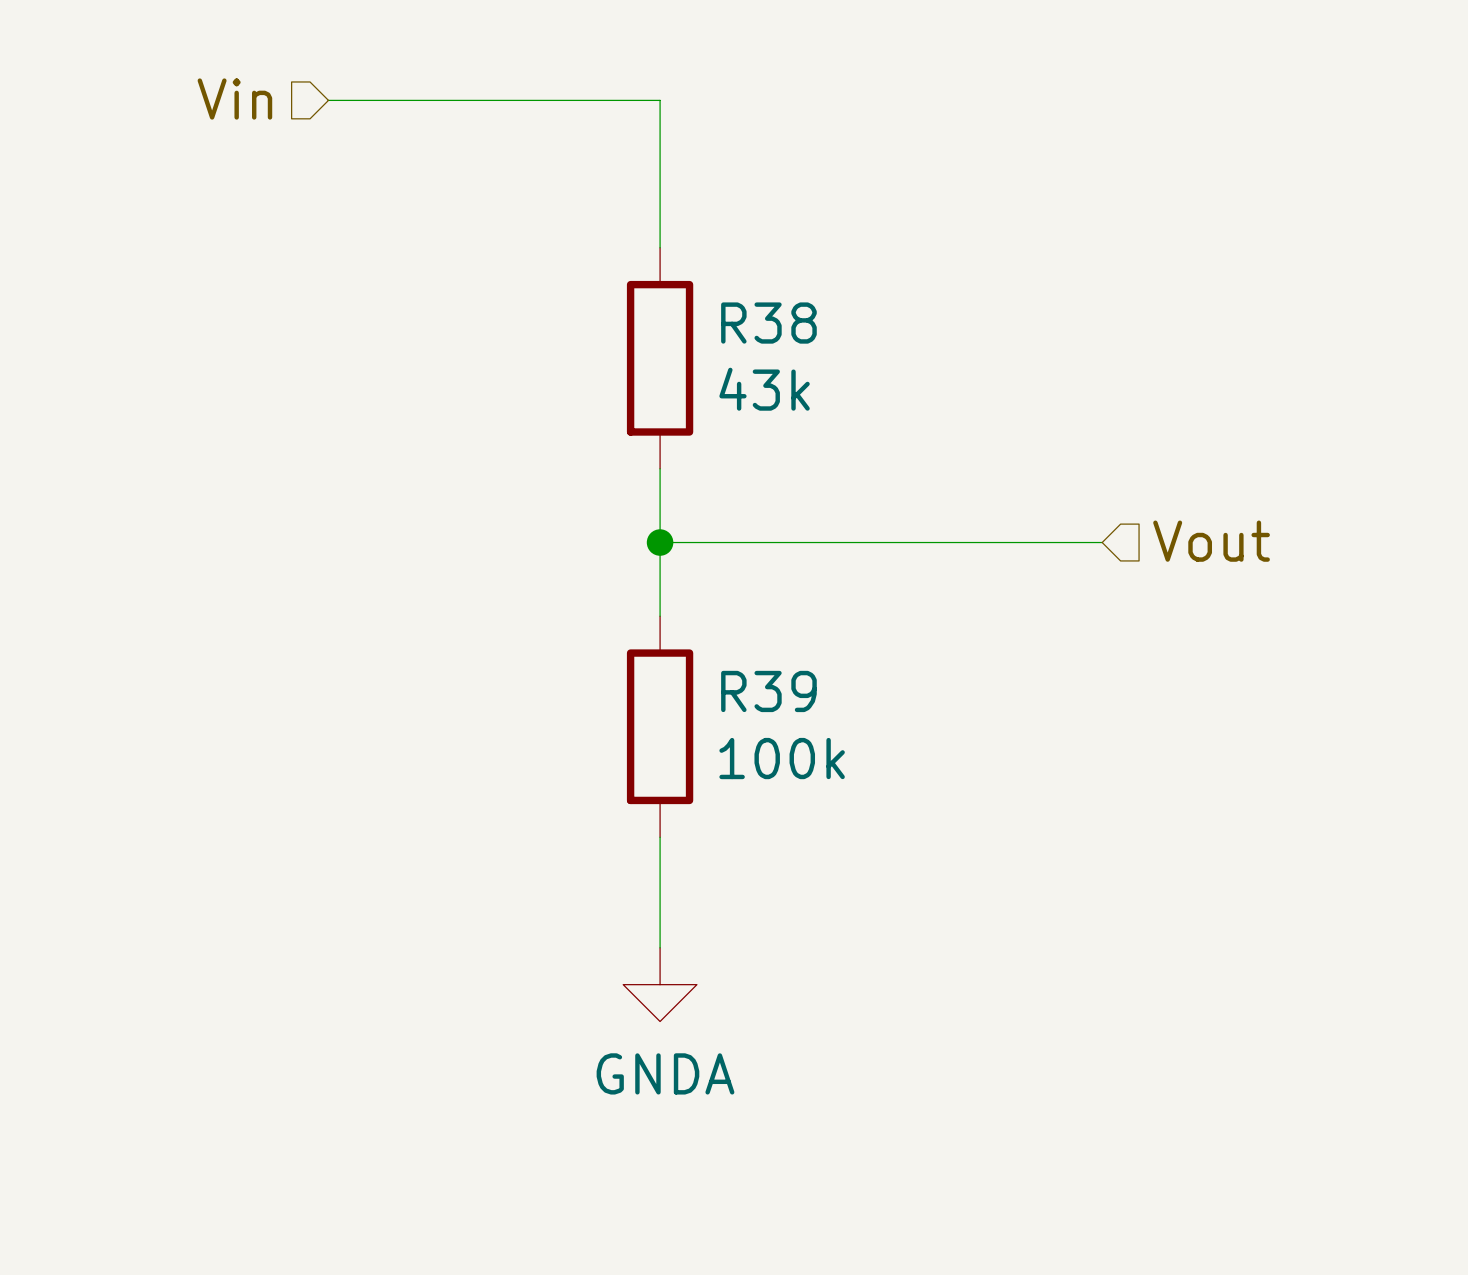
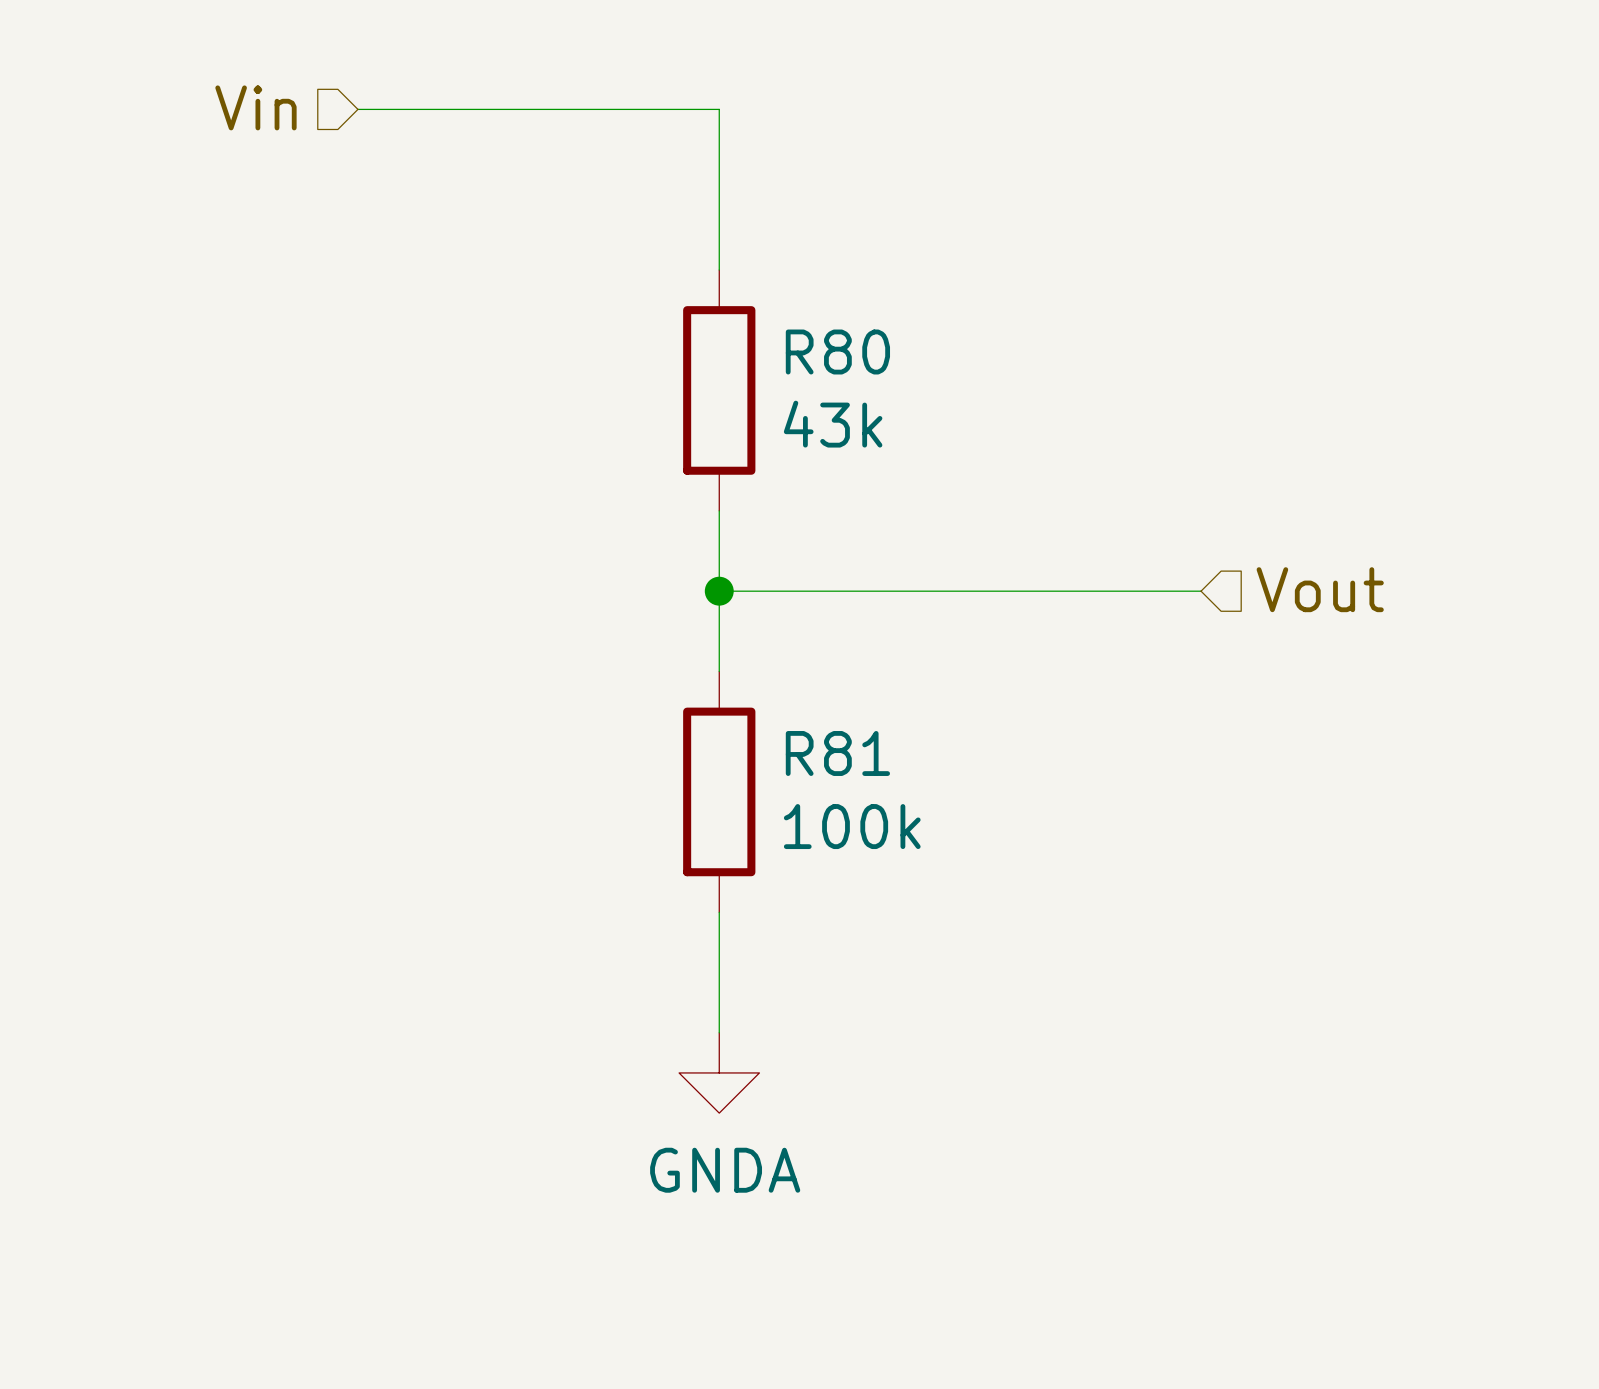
R38 name: R38 (768, 323) -> R80 (837, 352)
R39 name: R39 (768, 691) -> R81 (837, 753)

